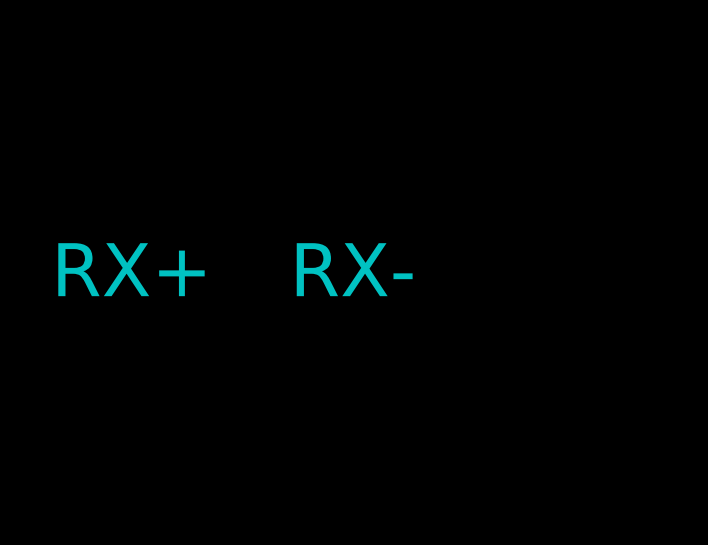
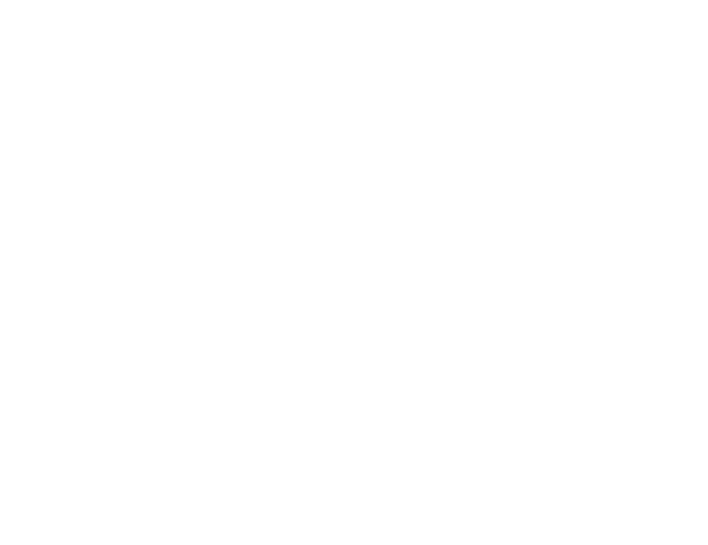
text: RX+ (131, 269) -> none
text: RX- (354, 269) -> none

